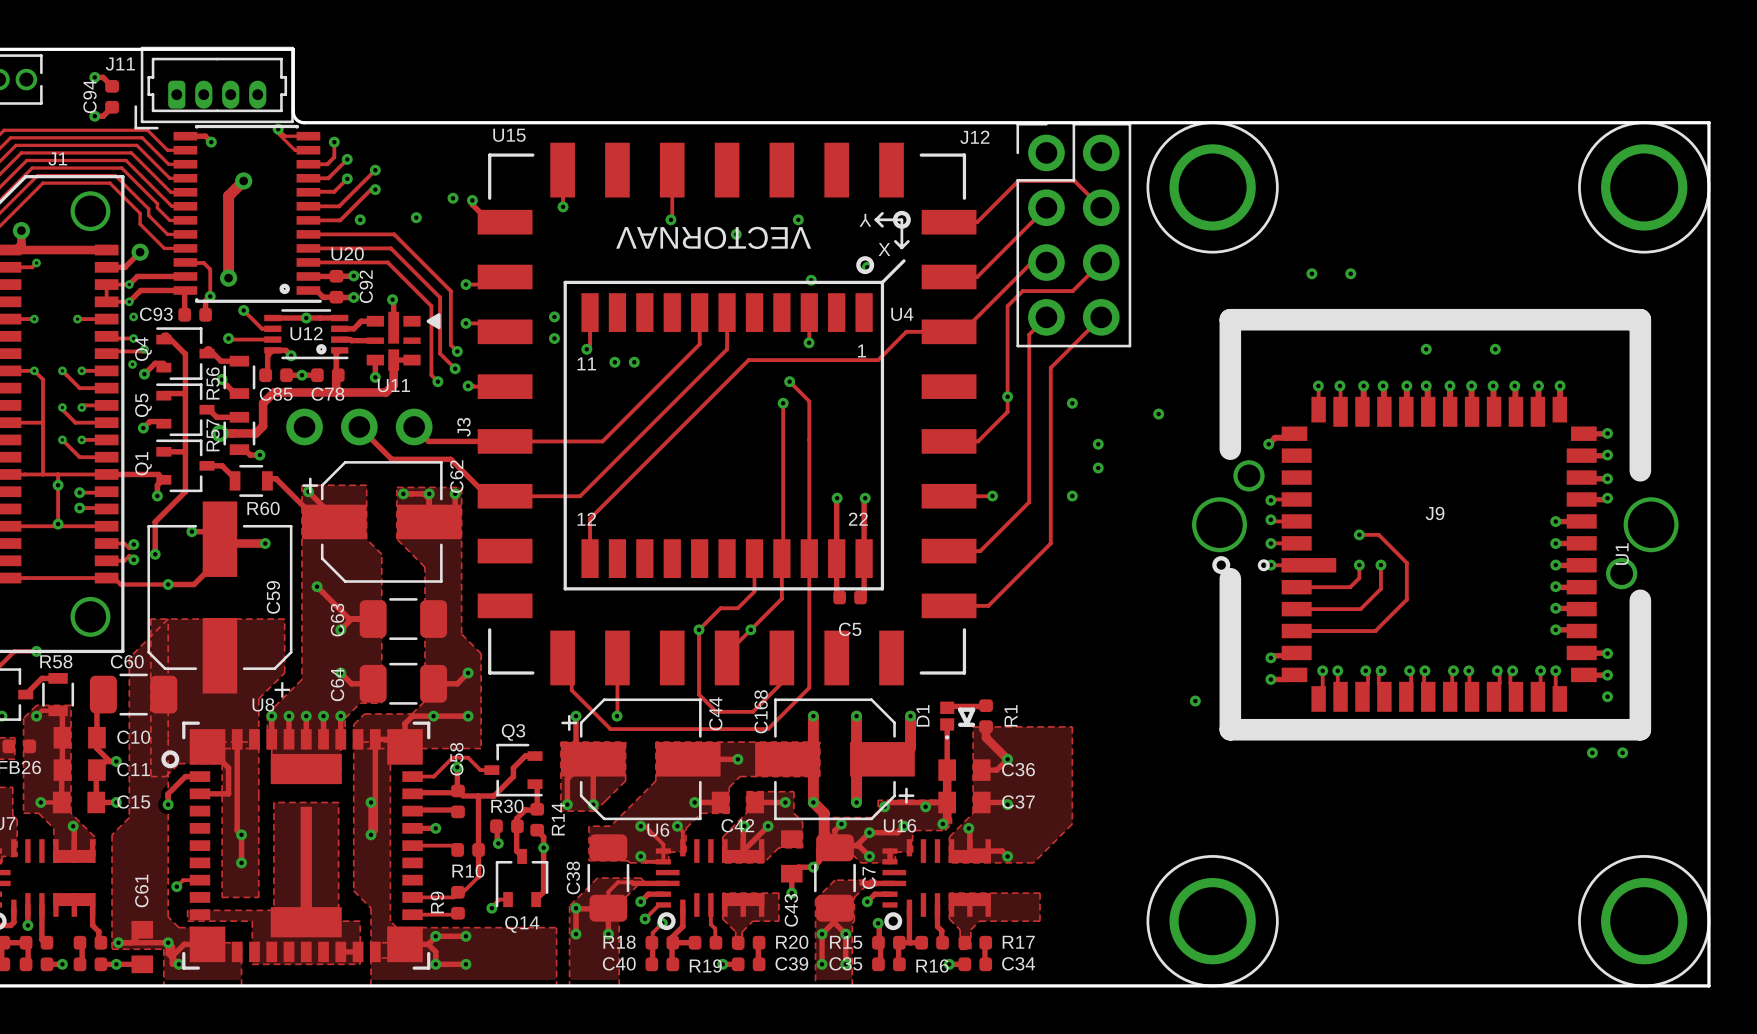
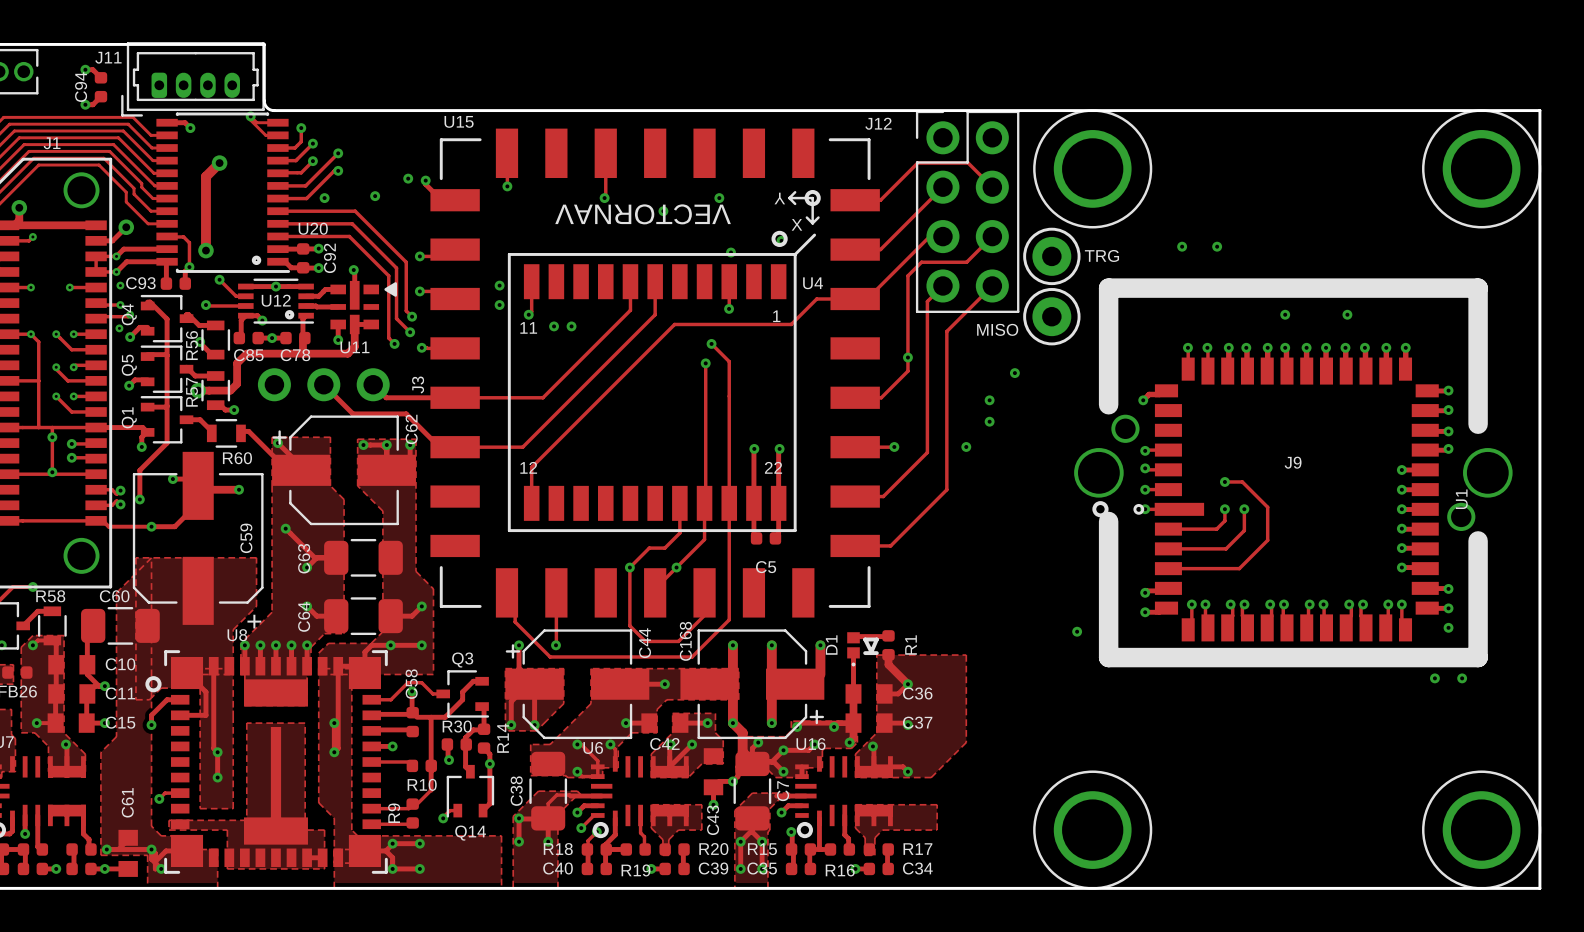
TRG: none -> (1051, 256)
MISO: none -> (1051, 316)
via: (1072, 403) -> none
via: none -> (1014, 373)
via: (1158, 414) -> none

